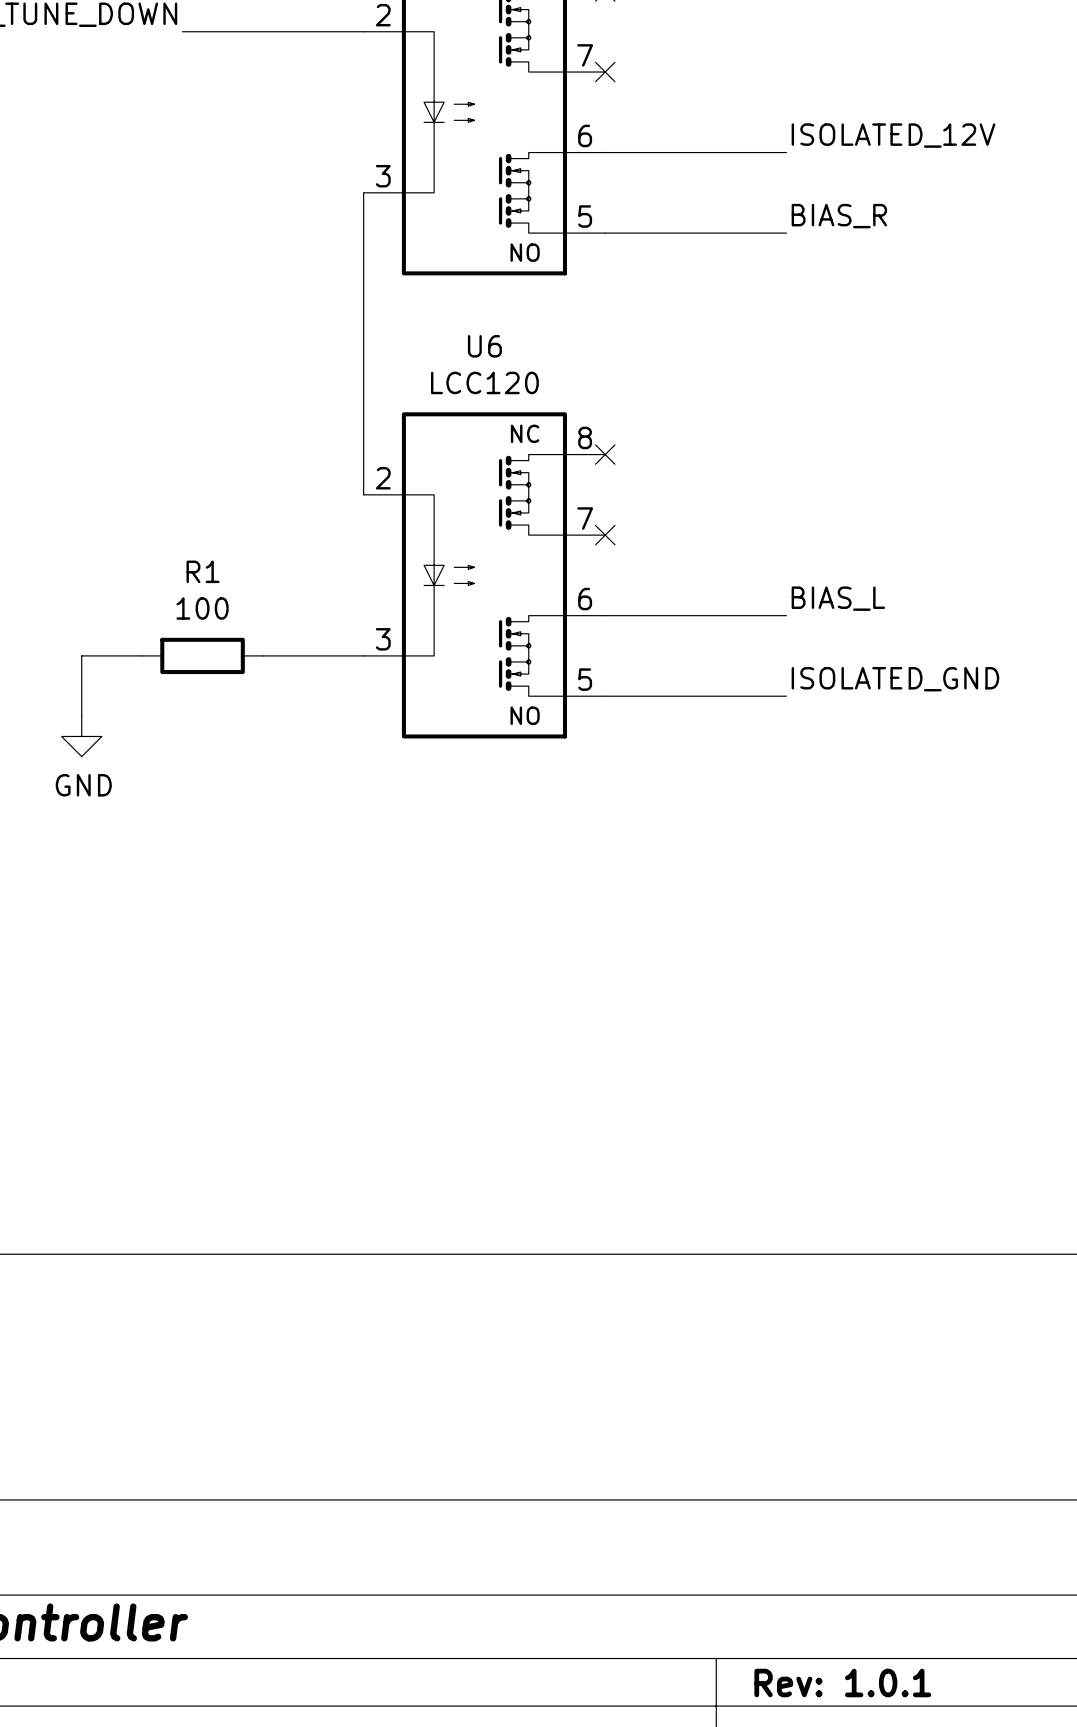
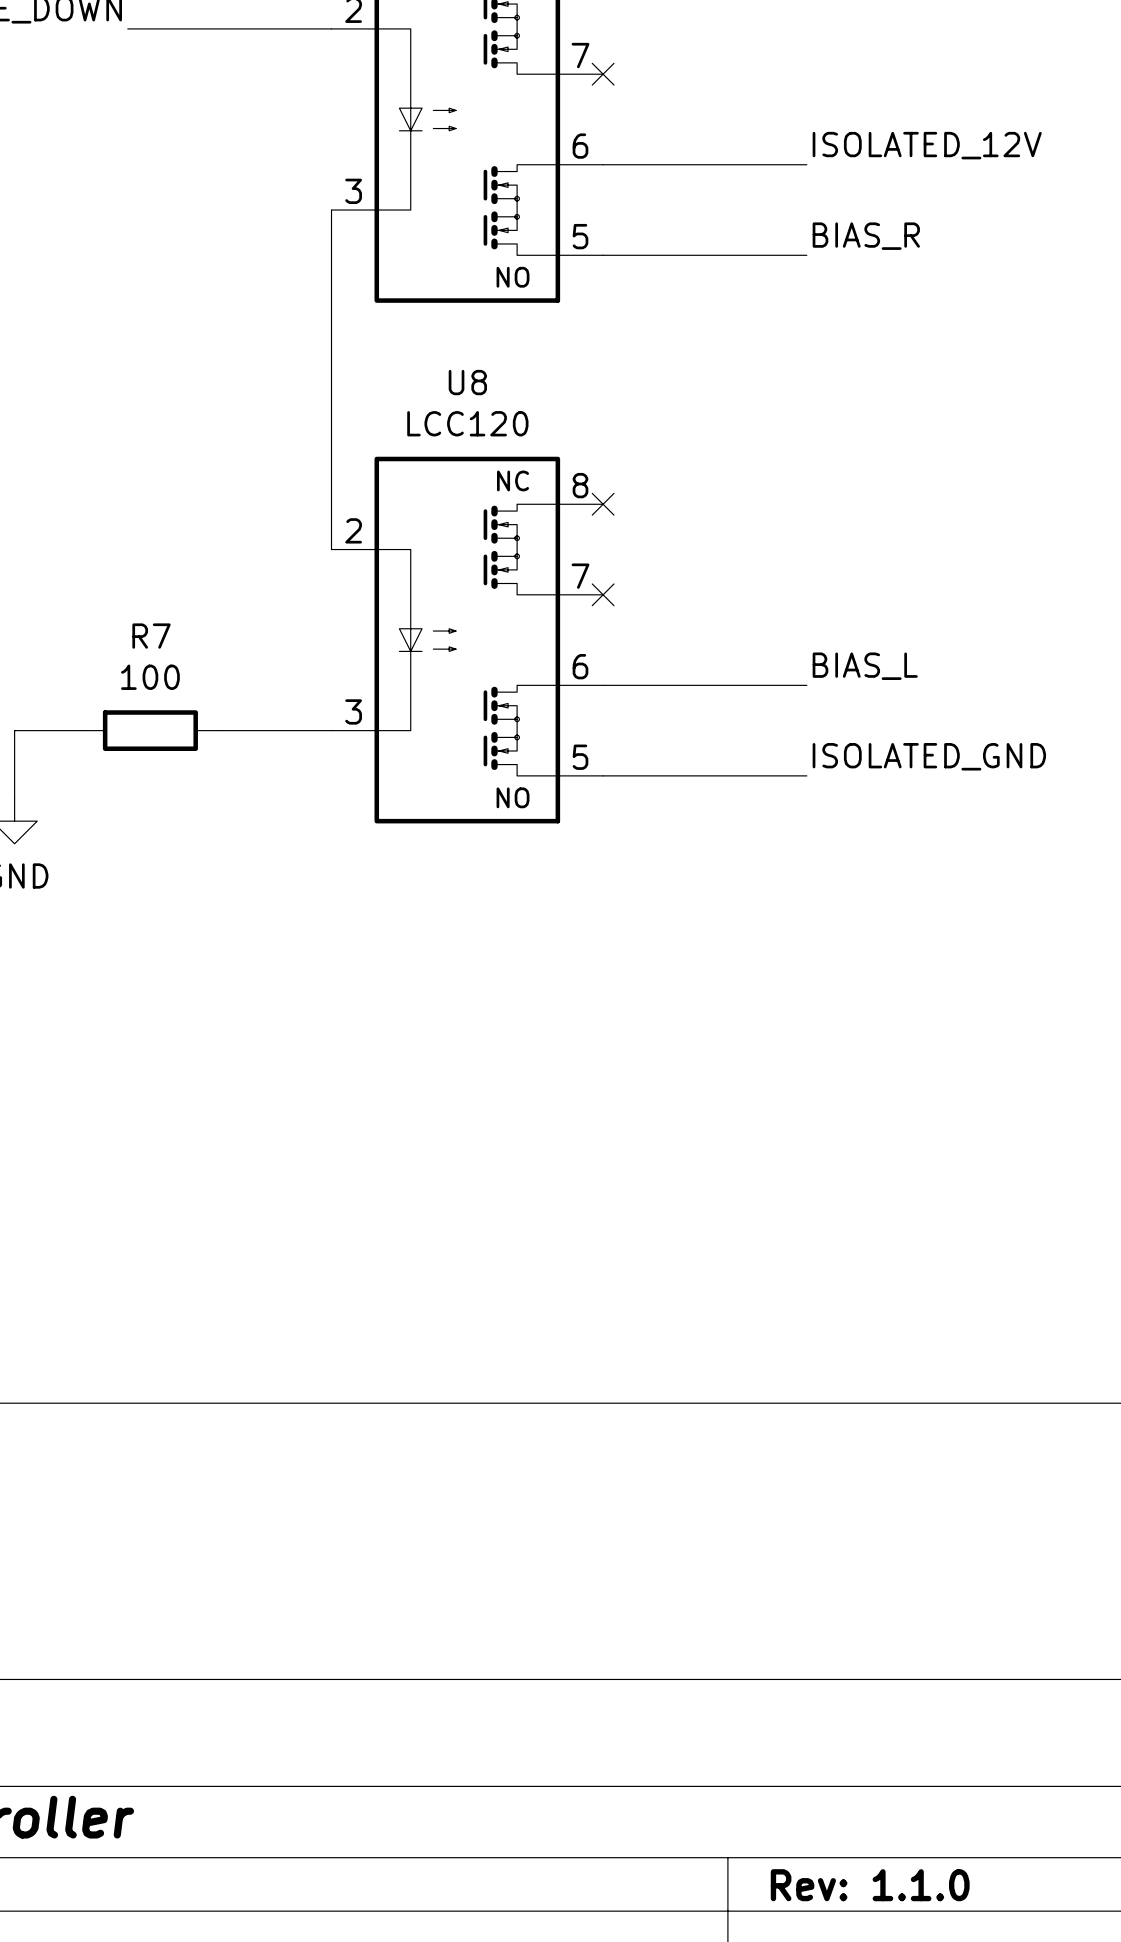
U6 name: U6 (484, 346) -> U8 (467, 382)
R1 name: R1 (203, 571) -> R7 (151, 636)
title block: Rev: 1.0.1 (842, 1682) -> Rev: 1.1.0 (870, 1885)

